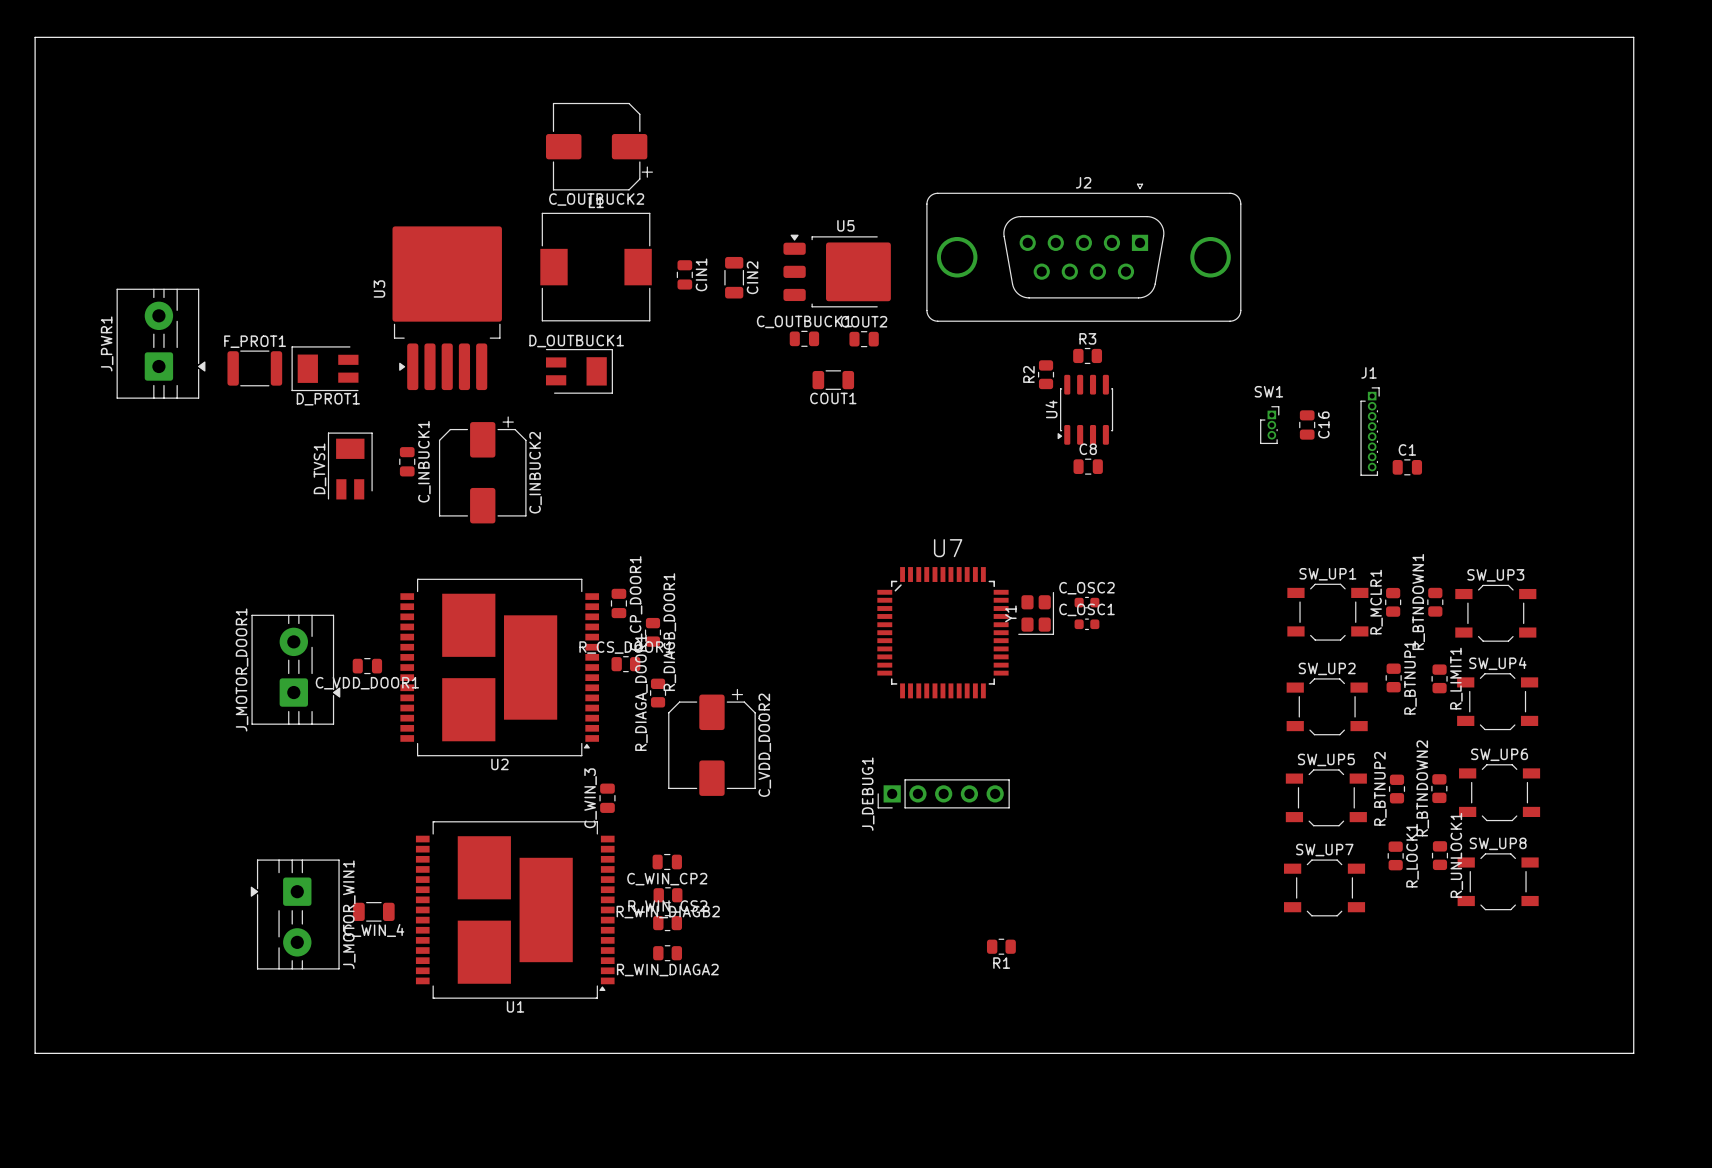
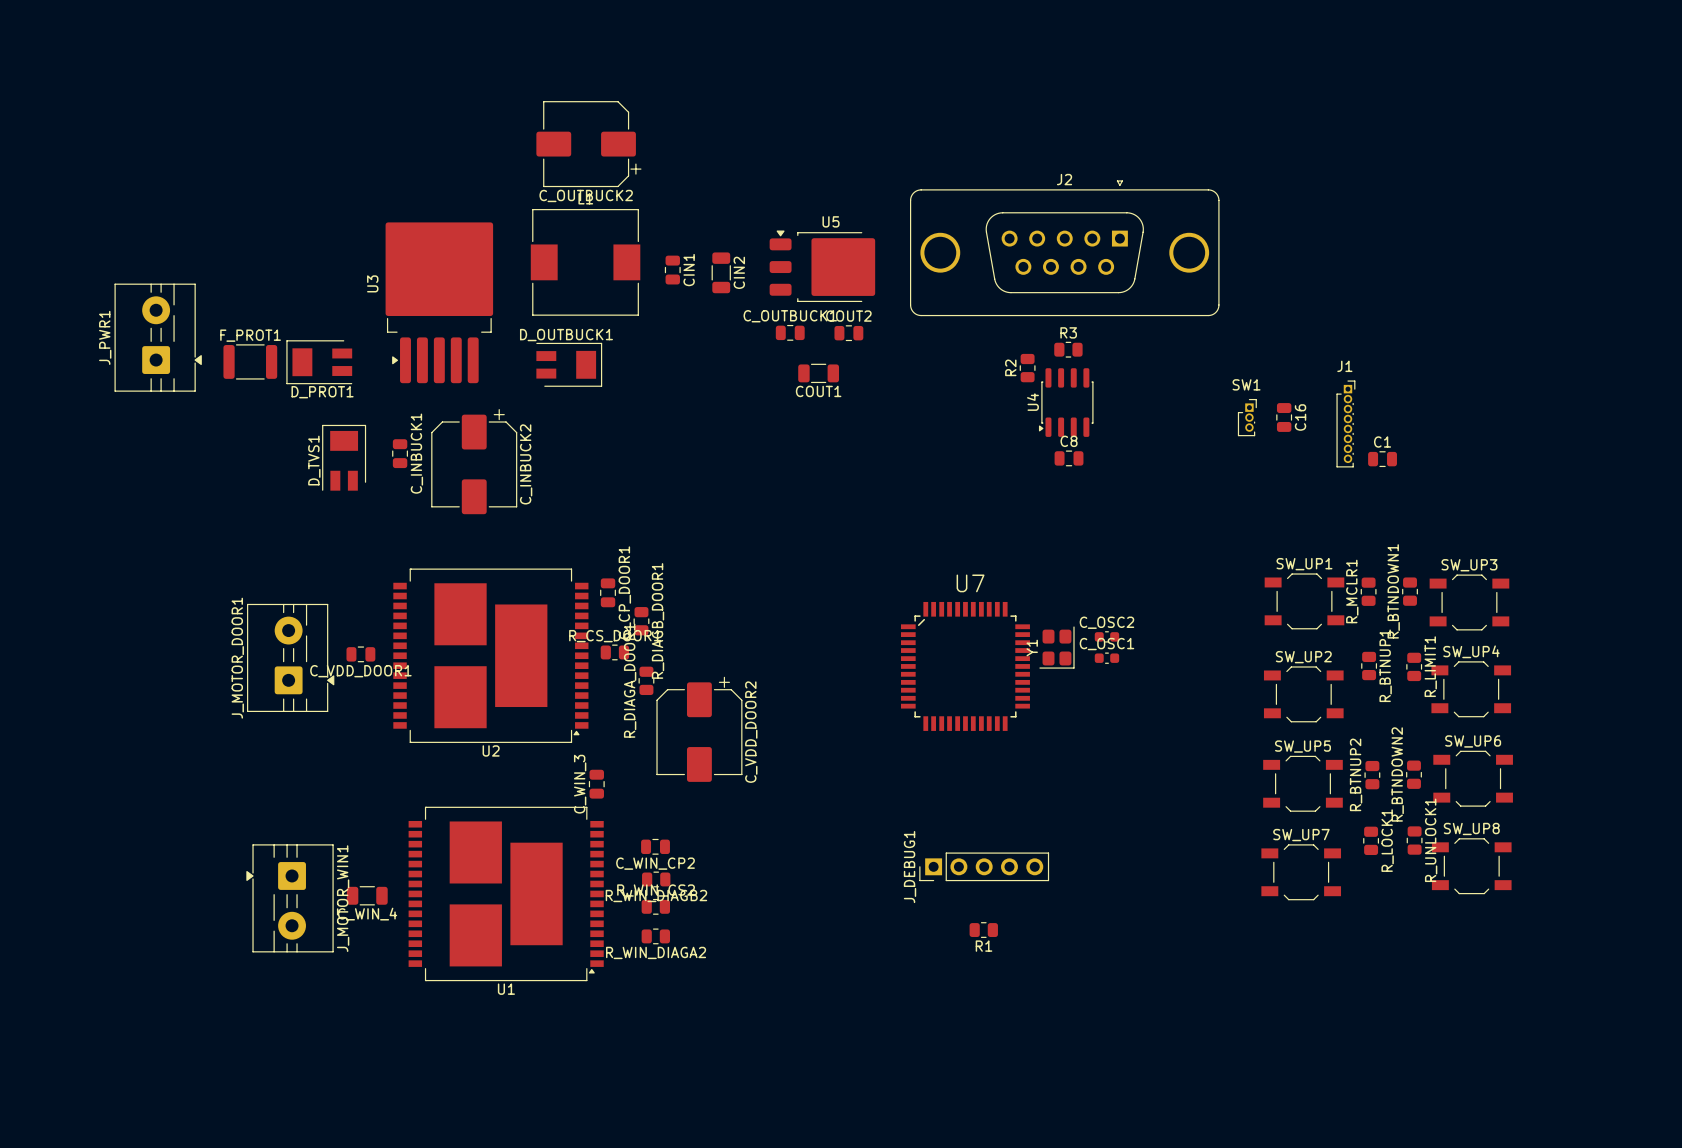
board edge: (35, 37) (1633, 37) (1633, 1053) (35, 1053) (35, 37) -> none
C_OSC2 position: (1086, 602) -> (1106, 636)
Y1 position: (1036, 613) -> (1056, 647)
C_OSC1 position: (1086, 624) -> (1106, 658)
U7 position: (942, 632) -> (965, 666)
J_DEBUG1 position: (943, 793) -> (984, 866)

